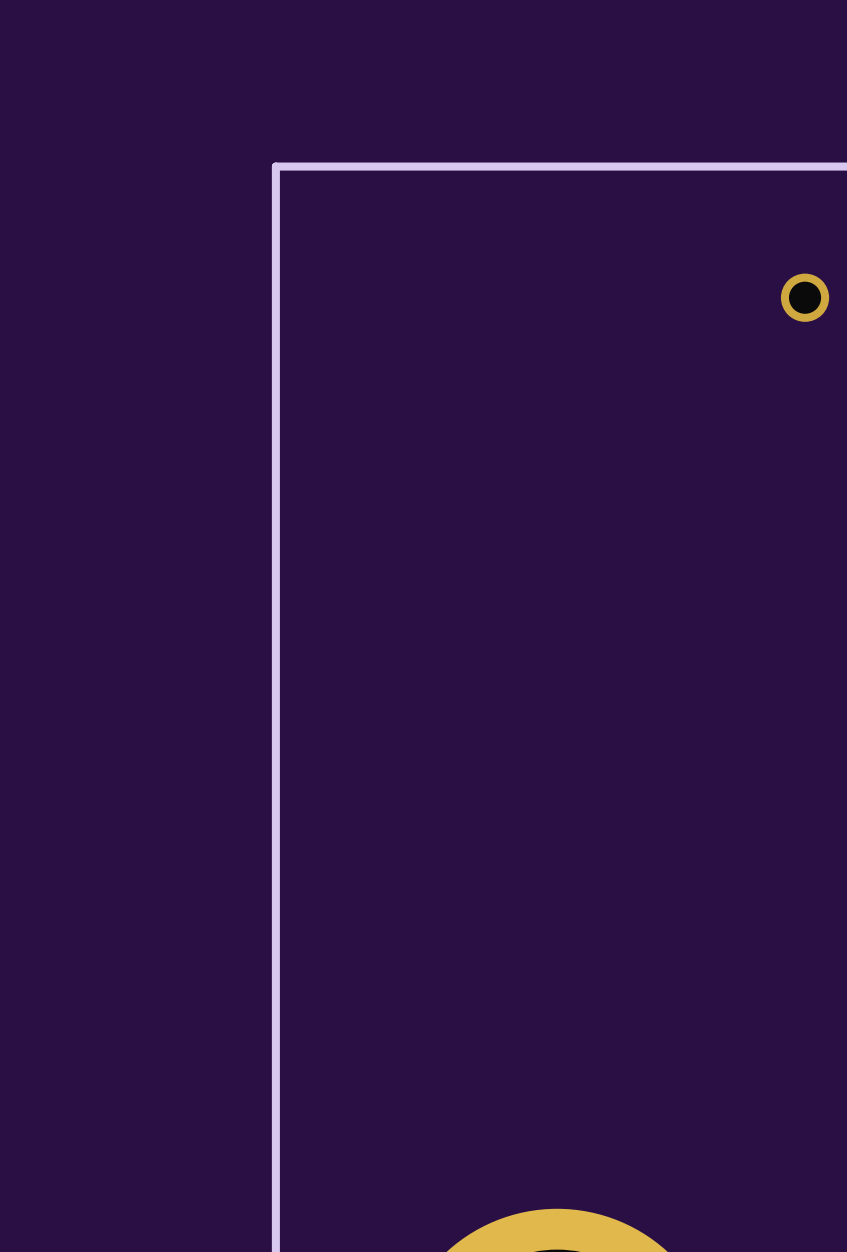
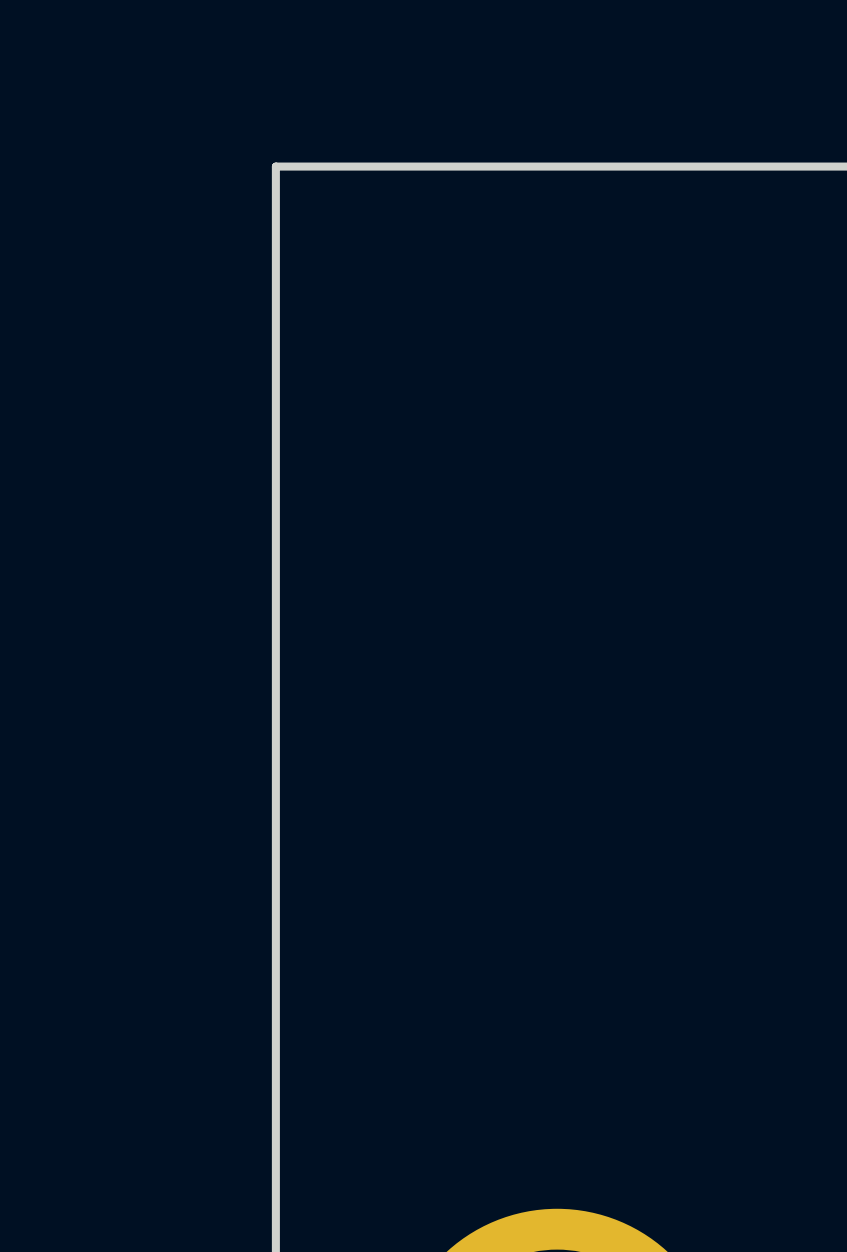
via: (805, 297) -> none

